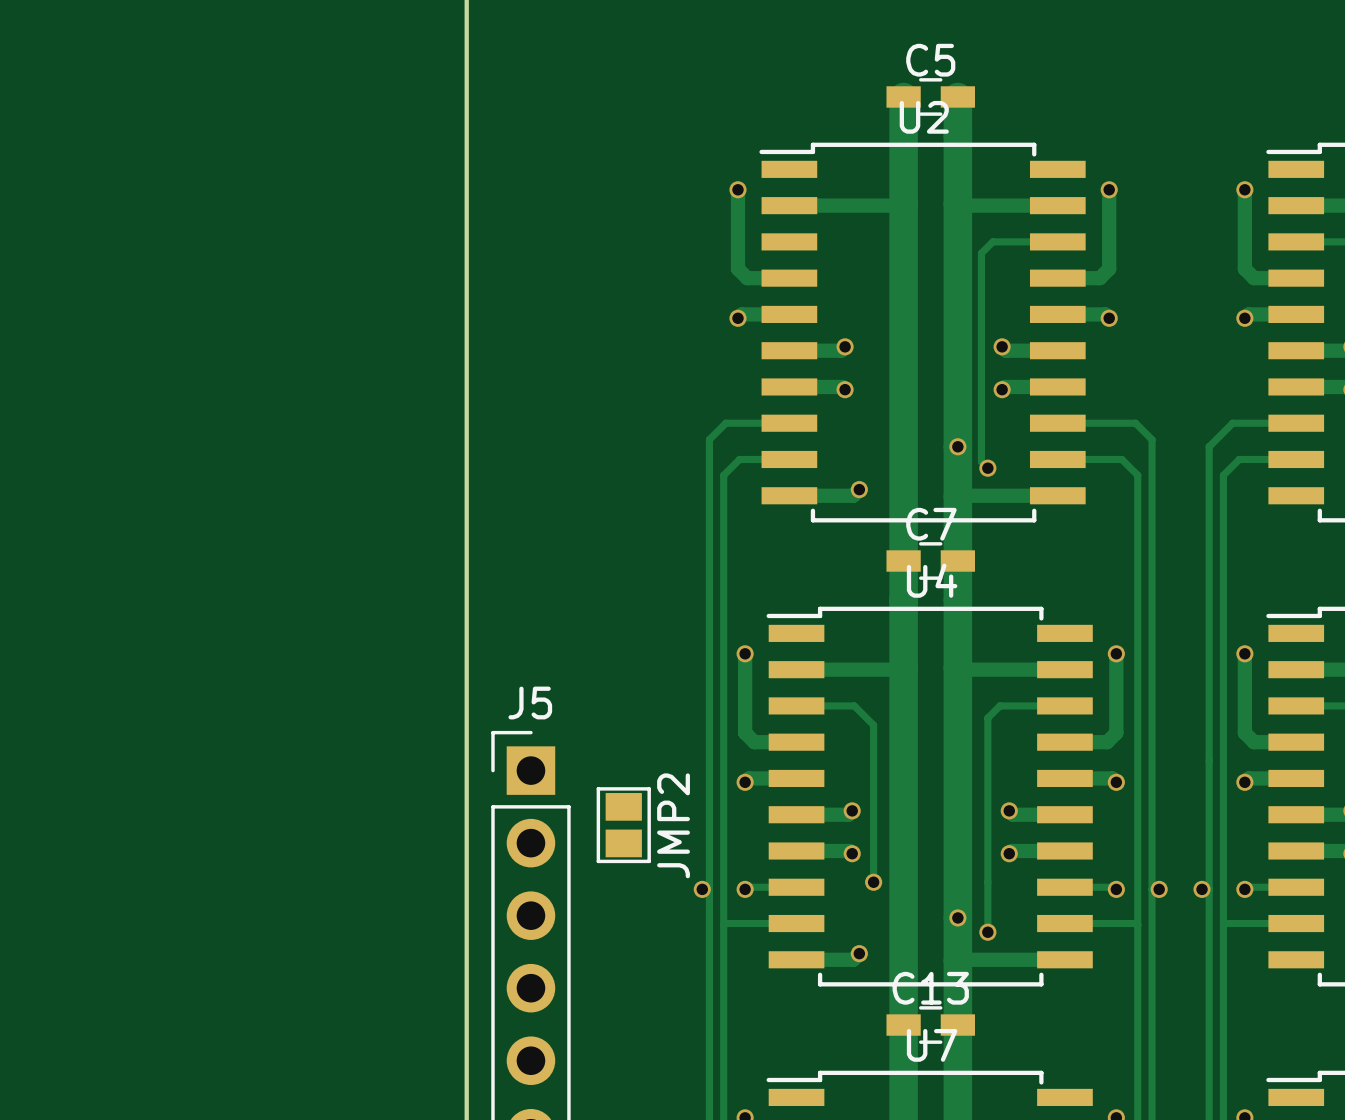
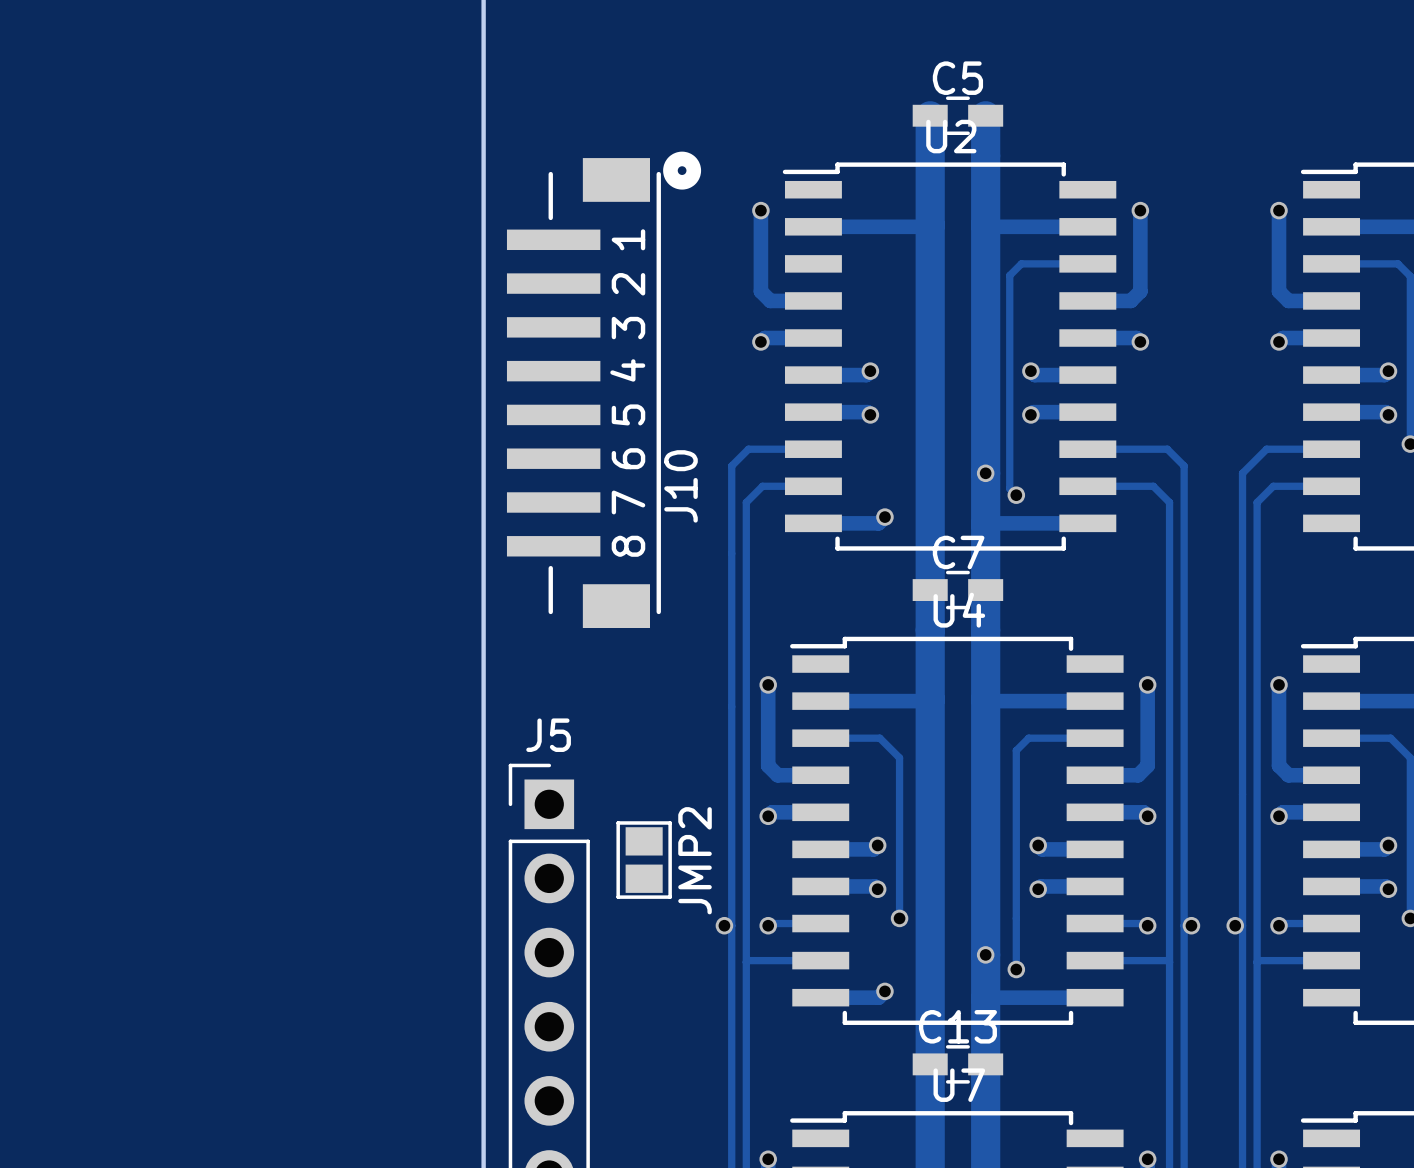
J10: none -> (604, 389)

